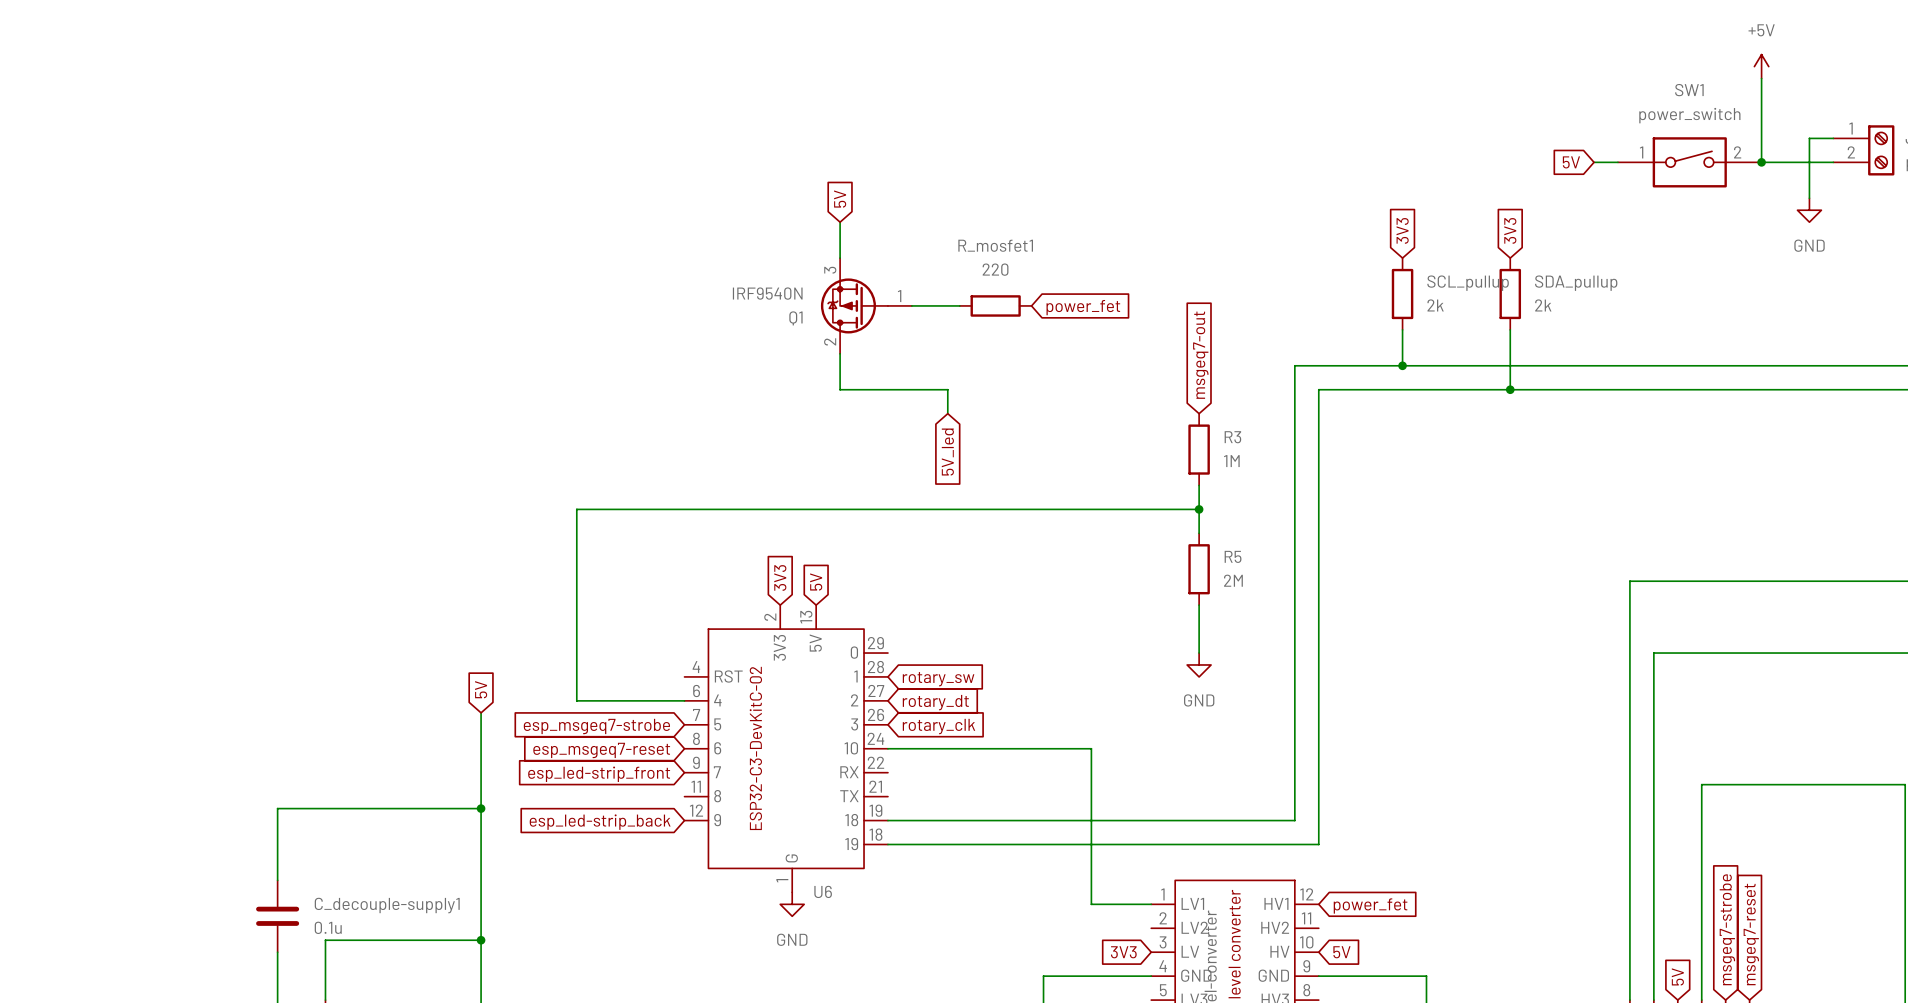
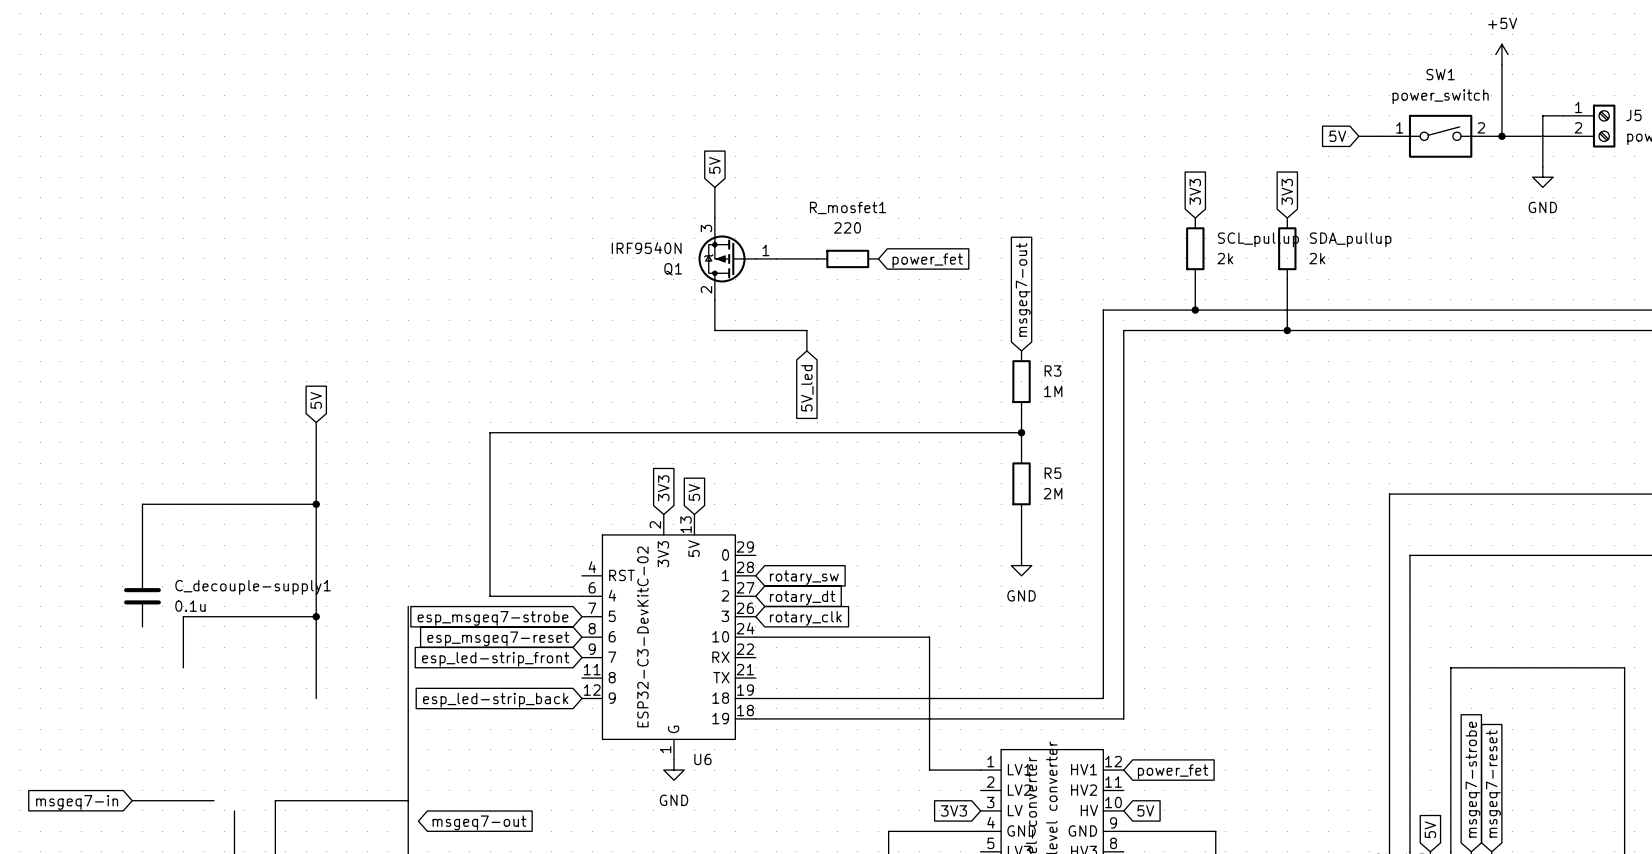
global label: none -> 5V (316, 400)
wire: none -> (316, 422) (316, 698)
wire: none -> (316, 504) (142, 504) (142, 565)
junction: none -> (316, 504)
global label: 5V (481, 689) -> none
wire: none -> (316, 616) (183, 616) (183, 667)
junction: none -> (316, 616)
wire: (481, 808) (277, 808) (277, 880) -> none
junction: (481, 808) -> none
C_decouple-supply1 position: (277, 916) -> (142, 596)
wire: none -> (132, 800) (214, 800)
junction: (481, 940) -> none
global label: none -> msgeq7-in (77, 802)
global label: none -> msgeq7-out (479, 822)

